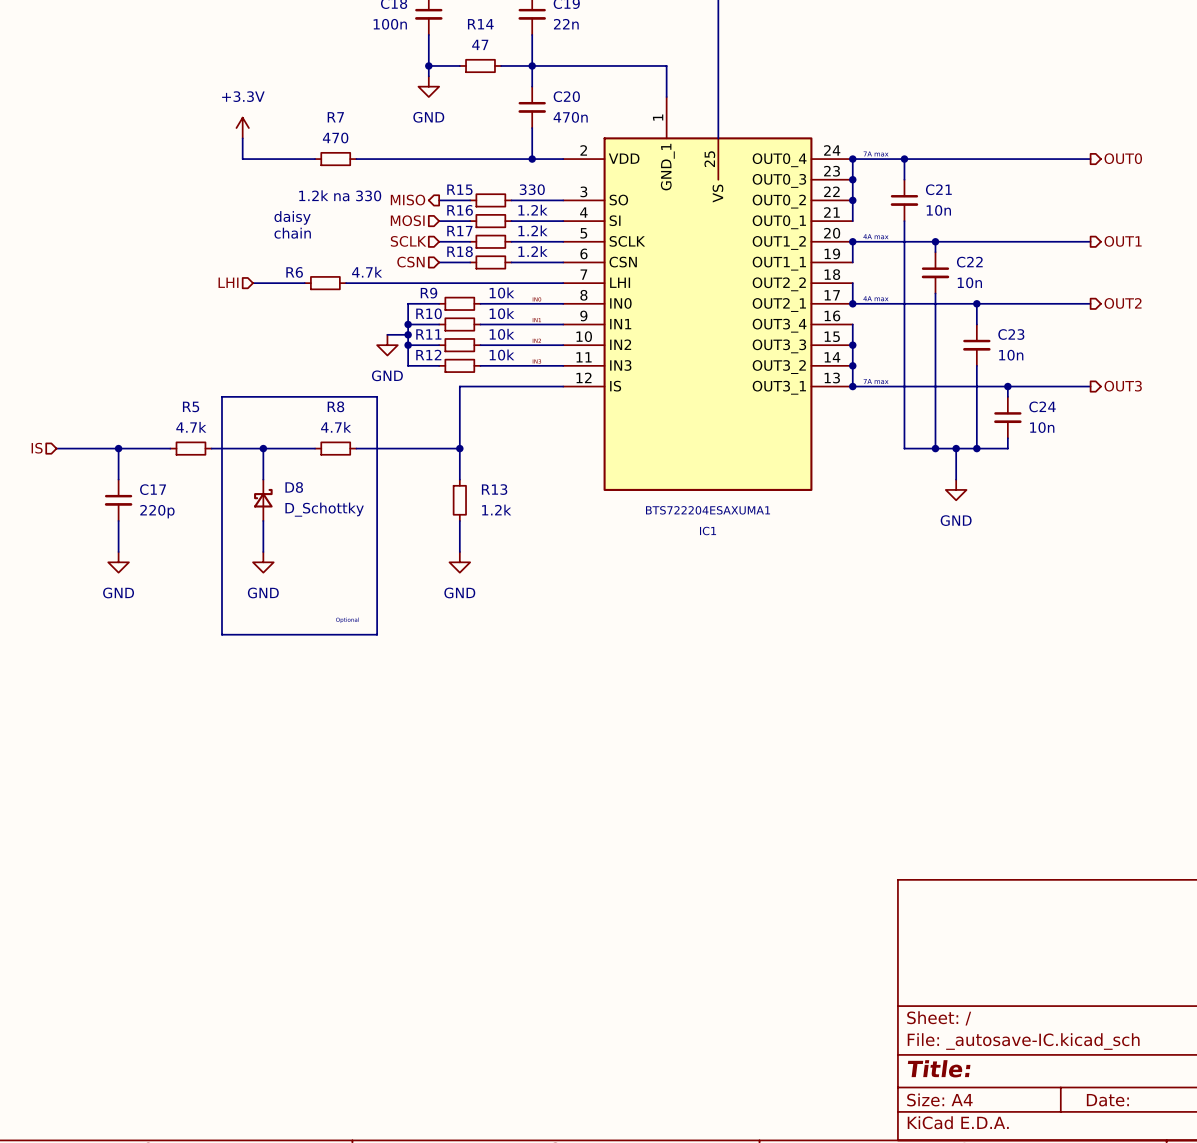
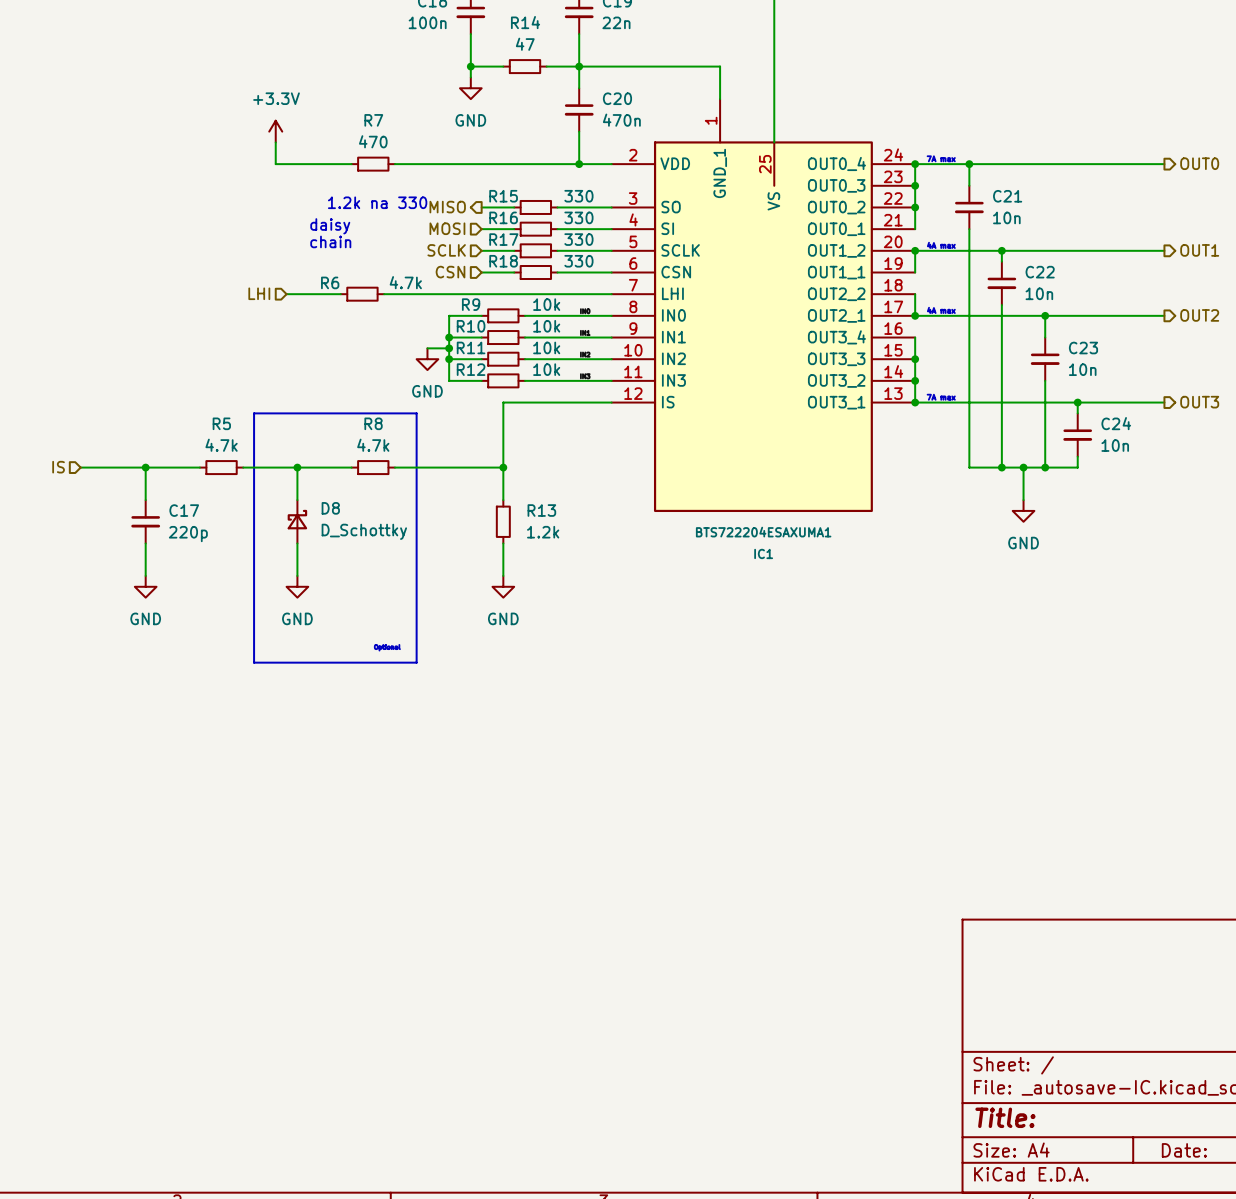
R16 value: 1.2k (532, 210) -> 330 (578, 217)
R17 value: 1.2k (532, 230) -> 330 (578, 239)
R18 value: 1.2k (532, 251) -> 330 (578, 261)

